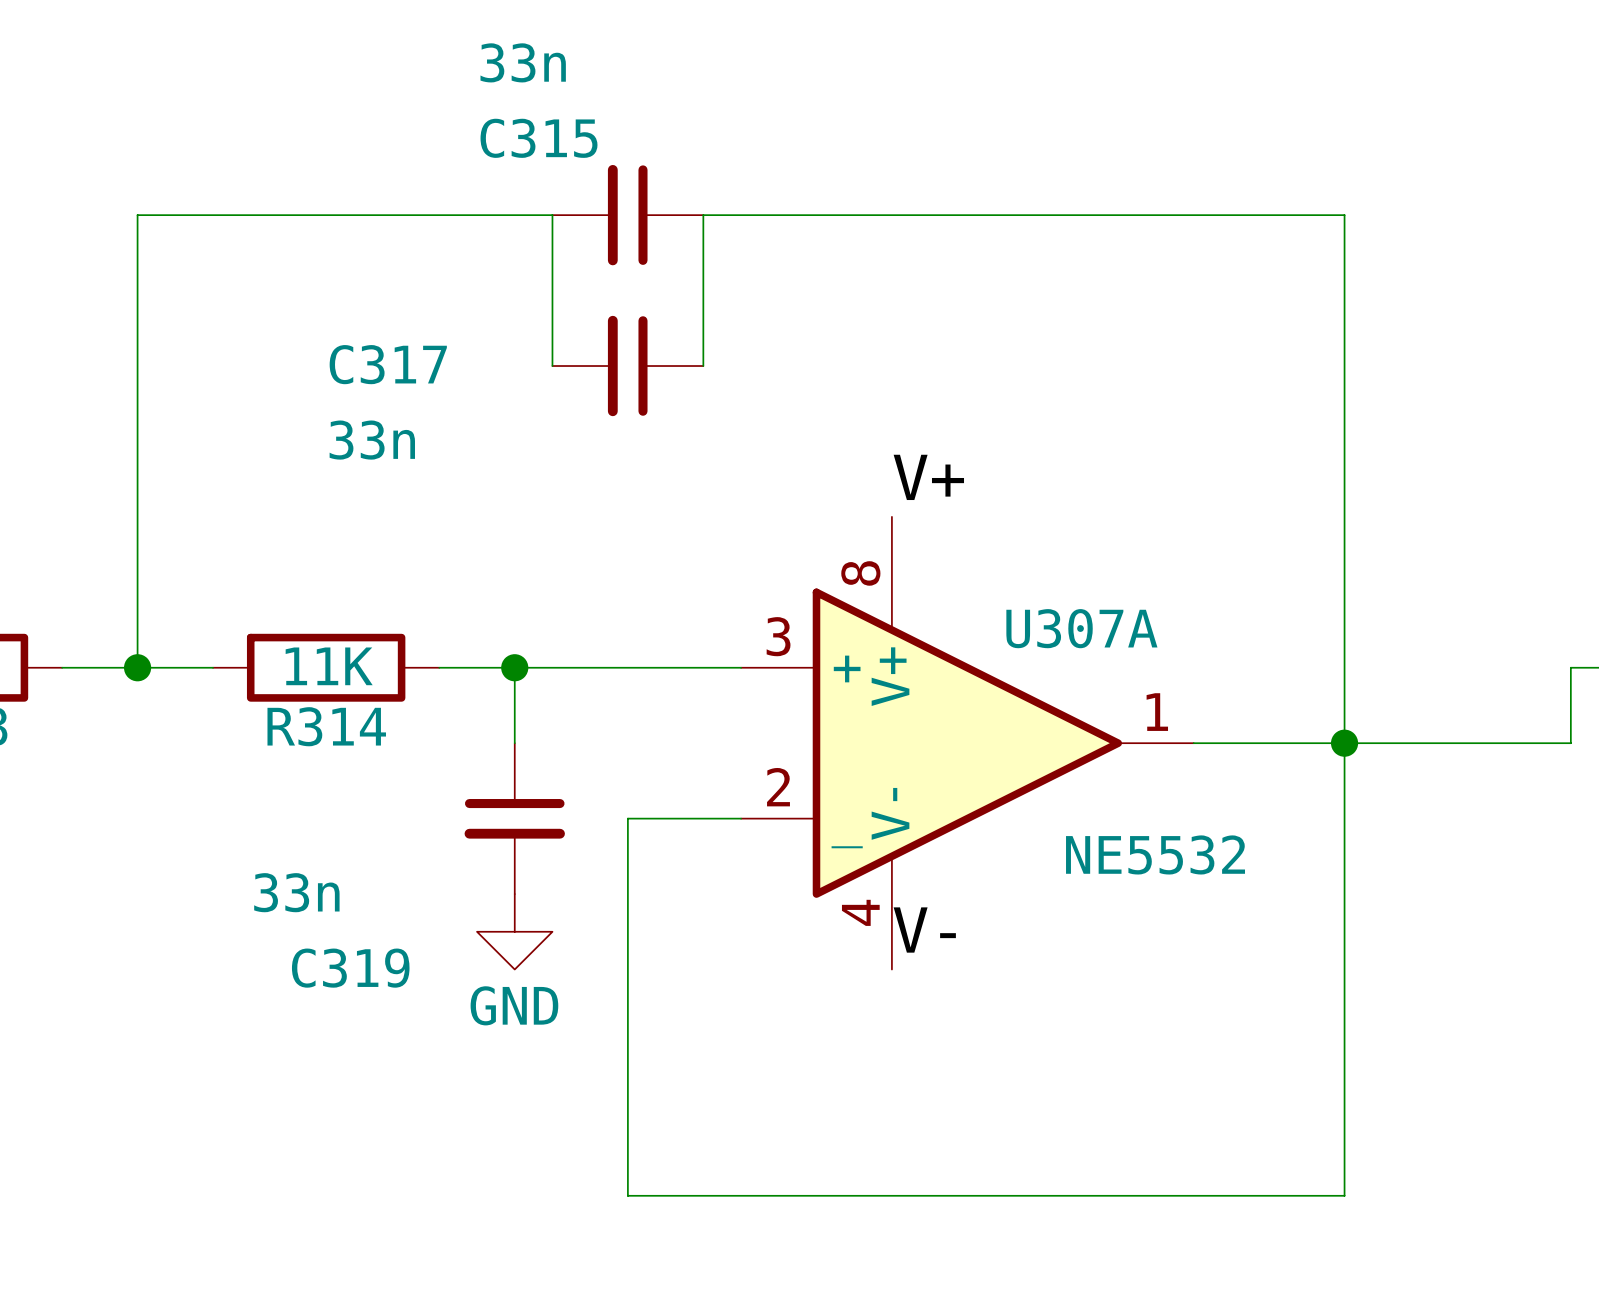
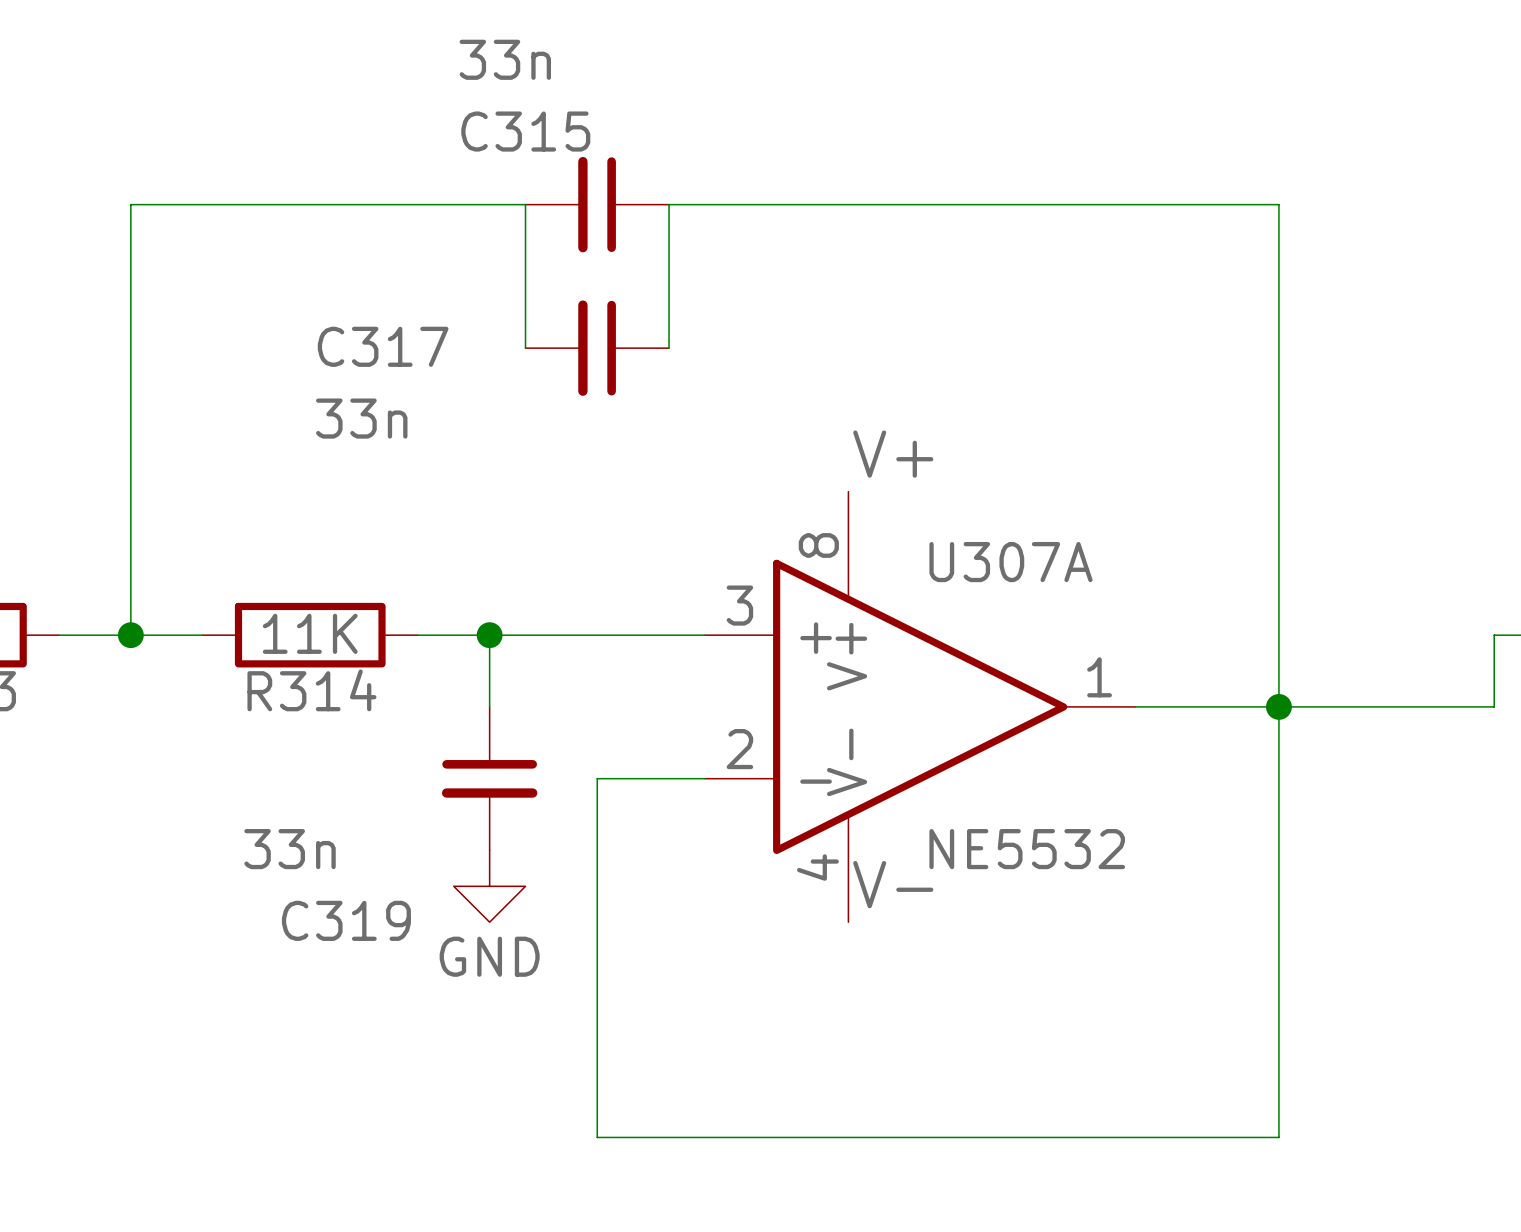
U307A name position: U307A (1081, 628) -> U307A (1010, 562)
U307A pin name: _ (847, 847) -> - (816, 781)
U307A value position: NE5532 (1155, 854) -> NE5532 (1027, 849)

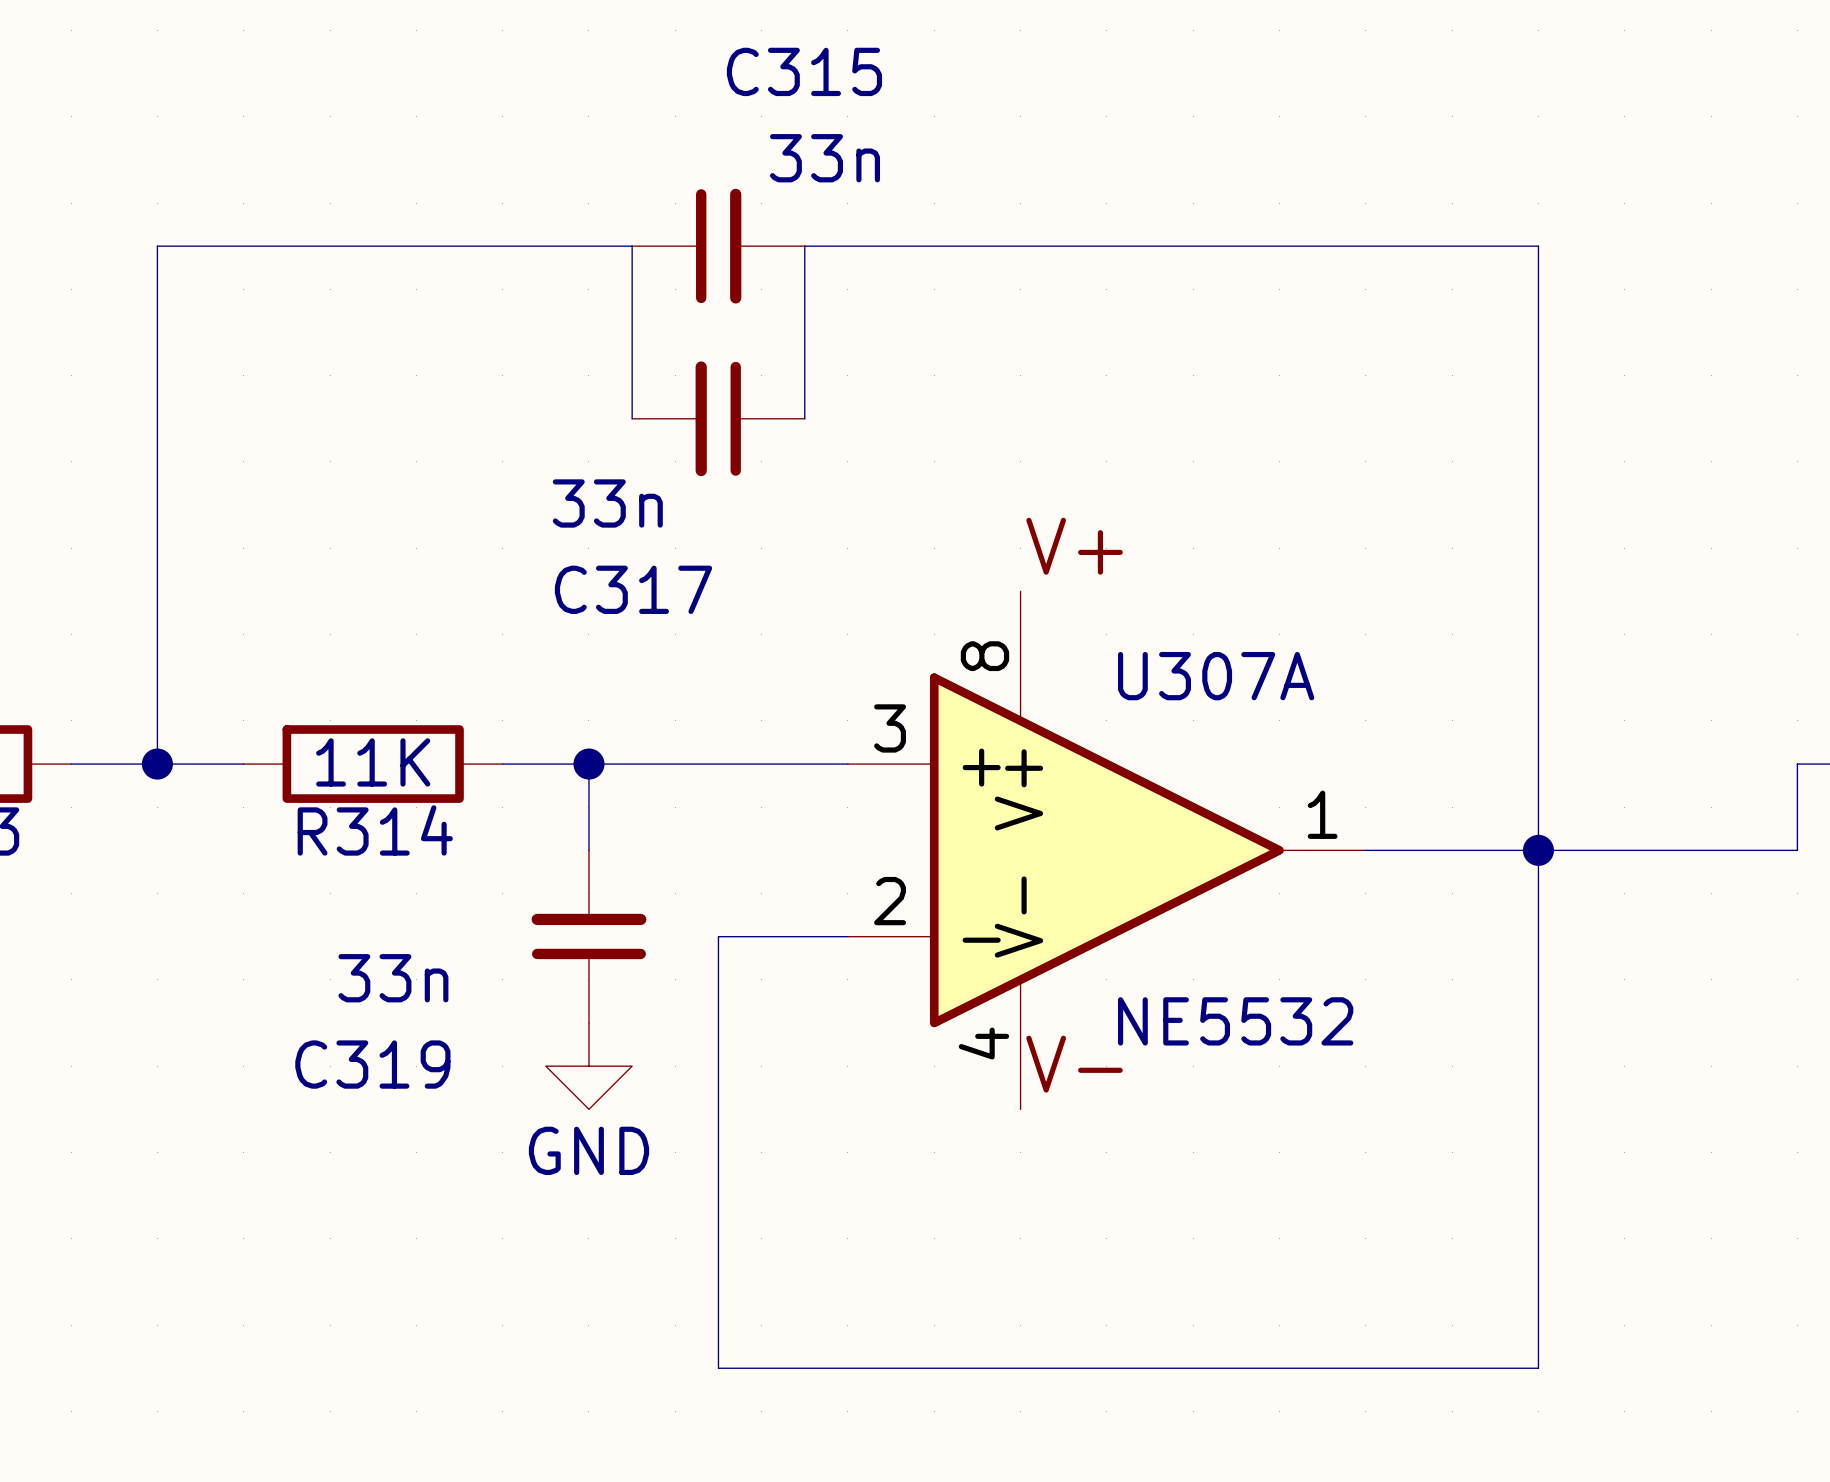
C315 value position: 33n (505, 59) -> 33n (825, 158)
C315 name position: C315 (525, 131) -> C315 (804, 71)
C315 rotation: 0° (597, 204) -> 180° (718, 246)
C317 name position: C317 (383, 346) -> C317 (633, 589)
C317 value position: 33n (361, 418) -> 33n (607, 503)
C319 rotation: 0° (489, 778) -> 180° (588, 936)
C319 name position: C319 (346, 920) -> C319 (372, 1064)

